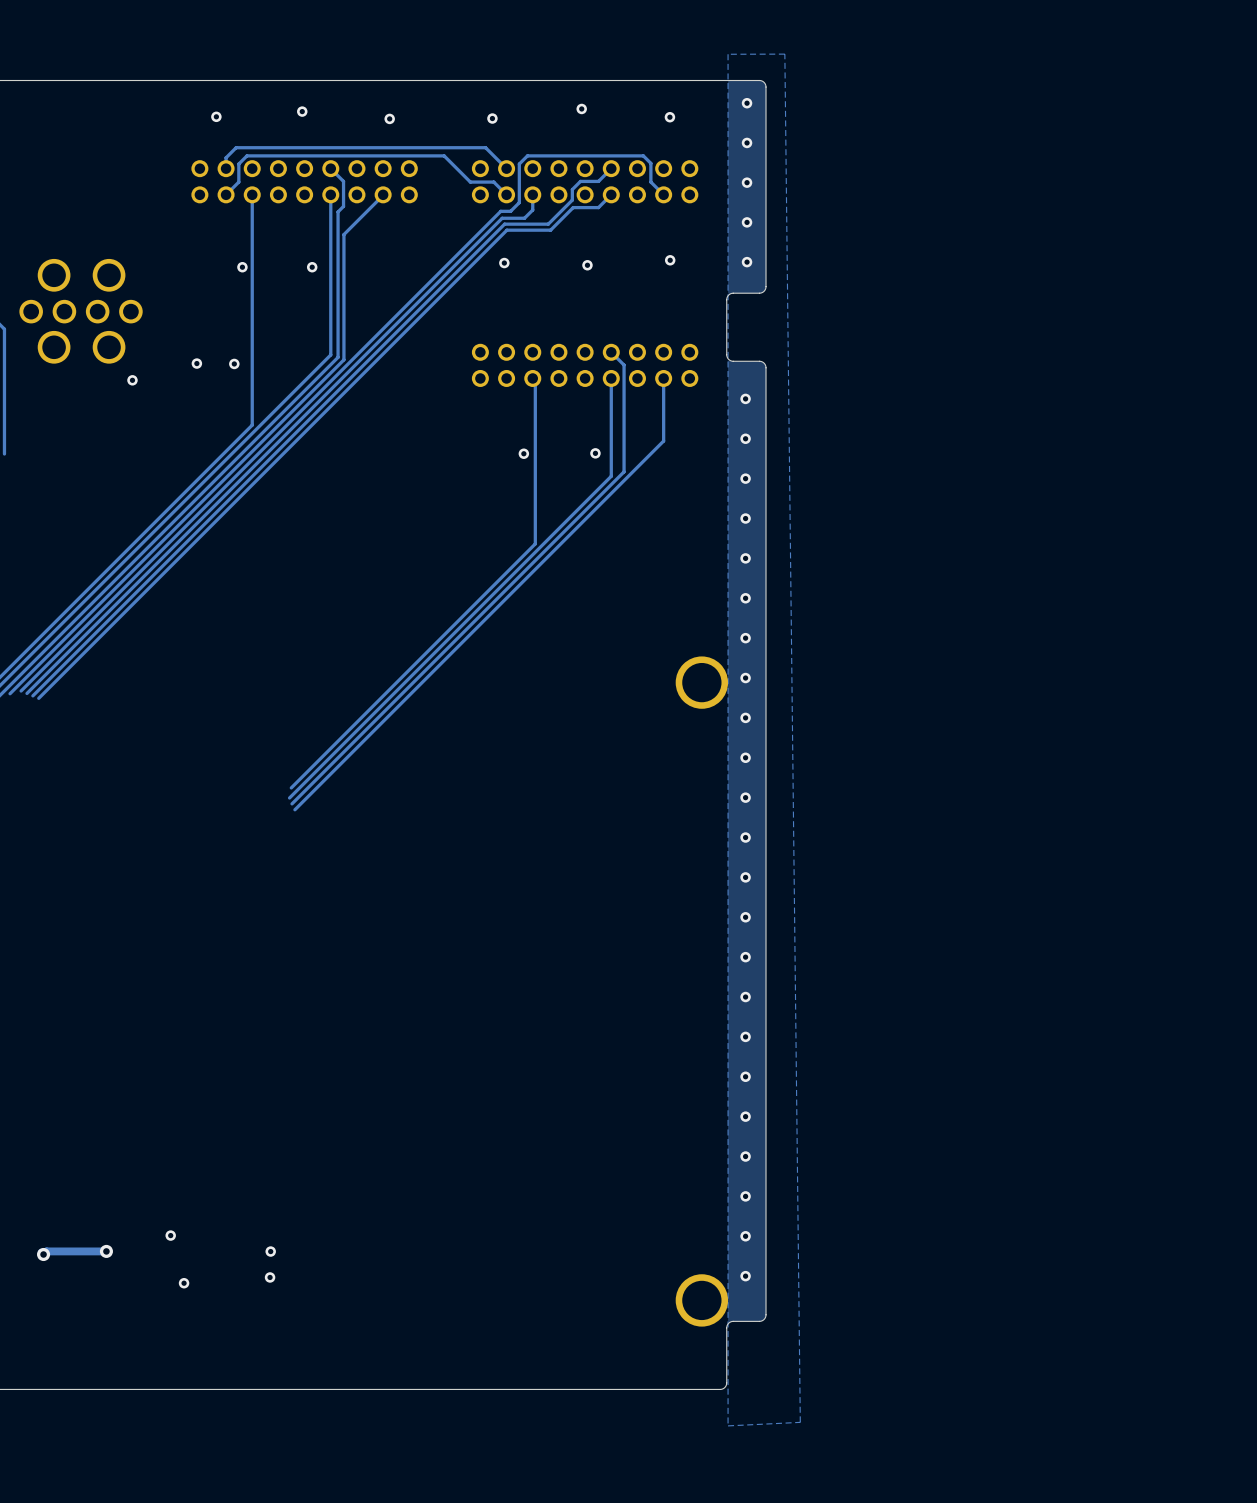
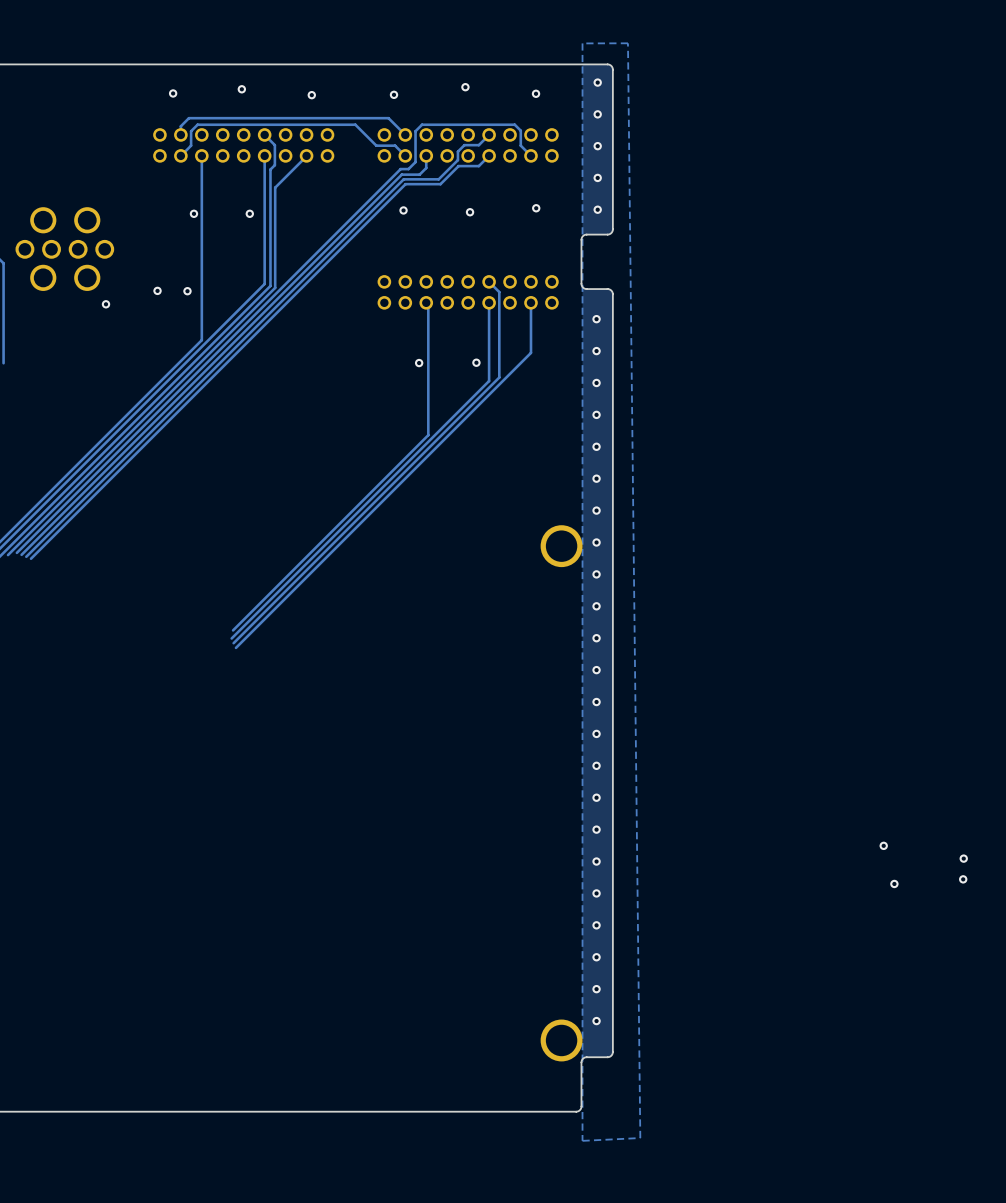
via: none -> (883, 845)
via: none -> (963, 858)
via: none -> (963, 879)
via: none -> (894, 883)
via: (170, 1235) -> none
track: (106, 1251) (46, 1251) (43, 1254) (41, 1252) -> none
via: (106, 1251) -> none
via: (270, 1251) -> none
via: (43, 1254) -> none
via: (270, 1277) -> none
via: (184, 1283) -> none

